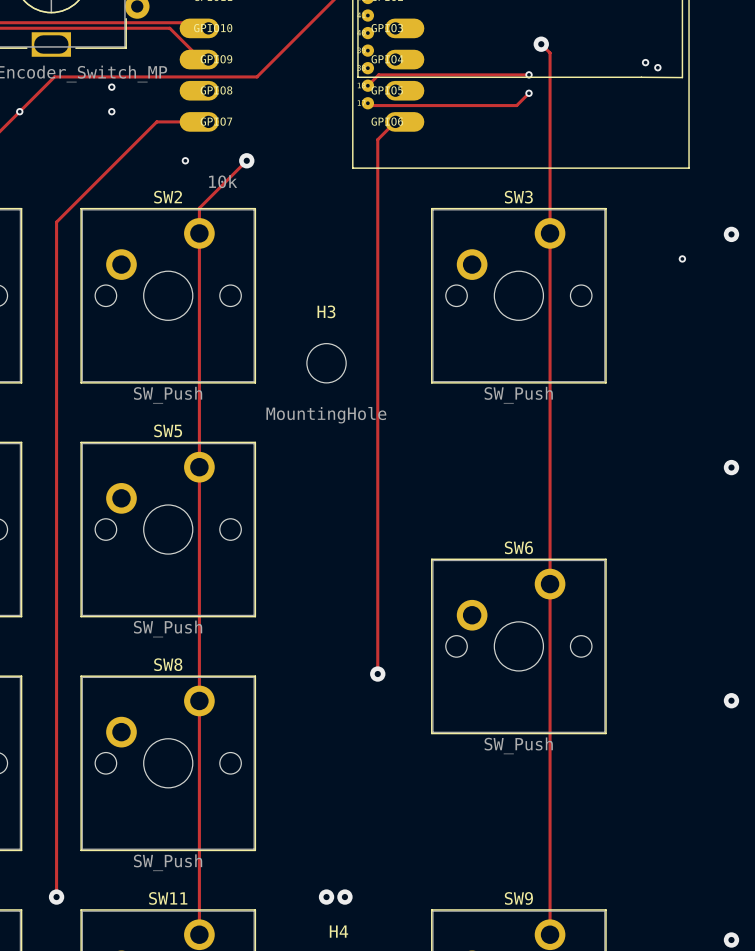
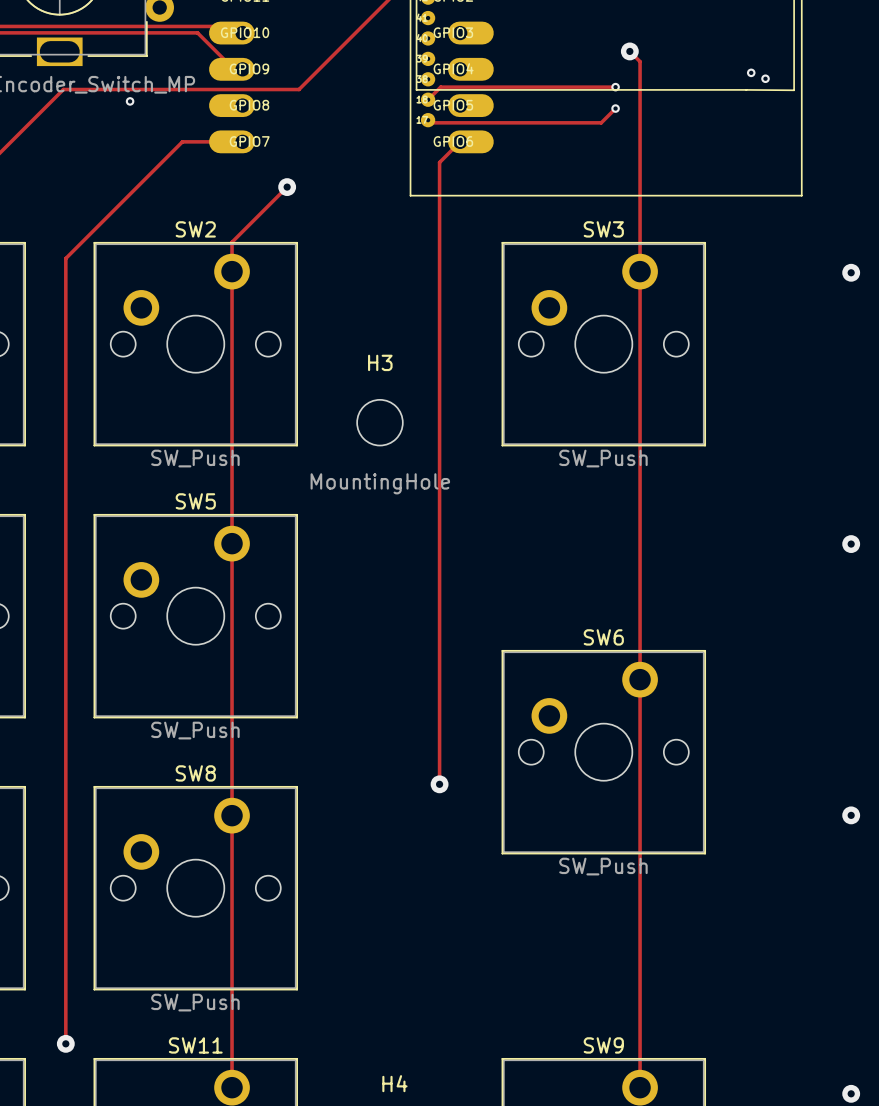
via: (19, 111) -> none
via: (111, 111) -> none
via: (185, 160) -> none
part: 10k (223, 181) -> none
via: (682, 258) -> none
via: (326, 897) -> none
via: (344, 897) -> none

